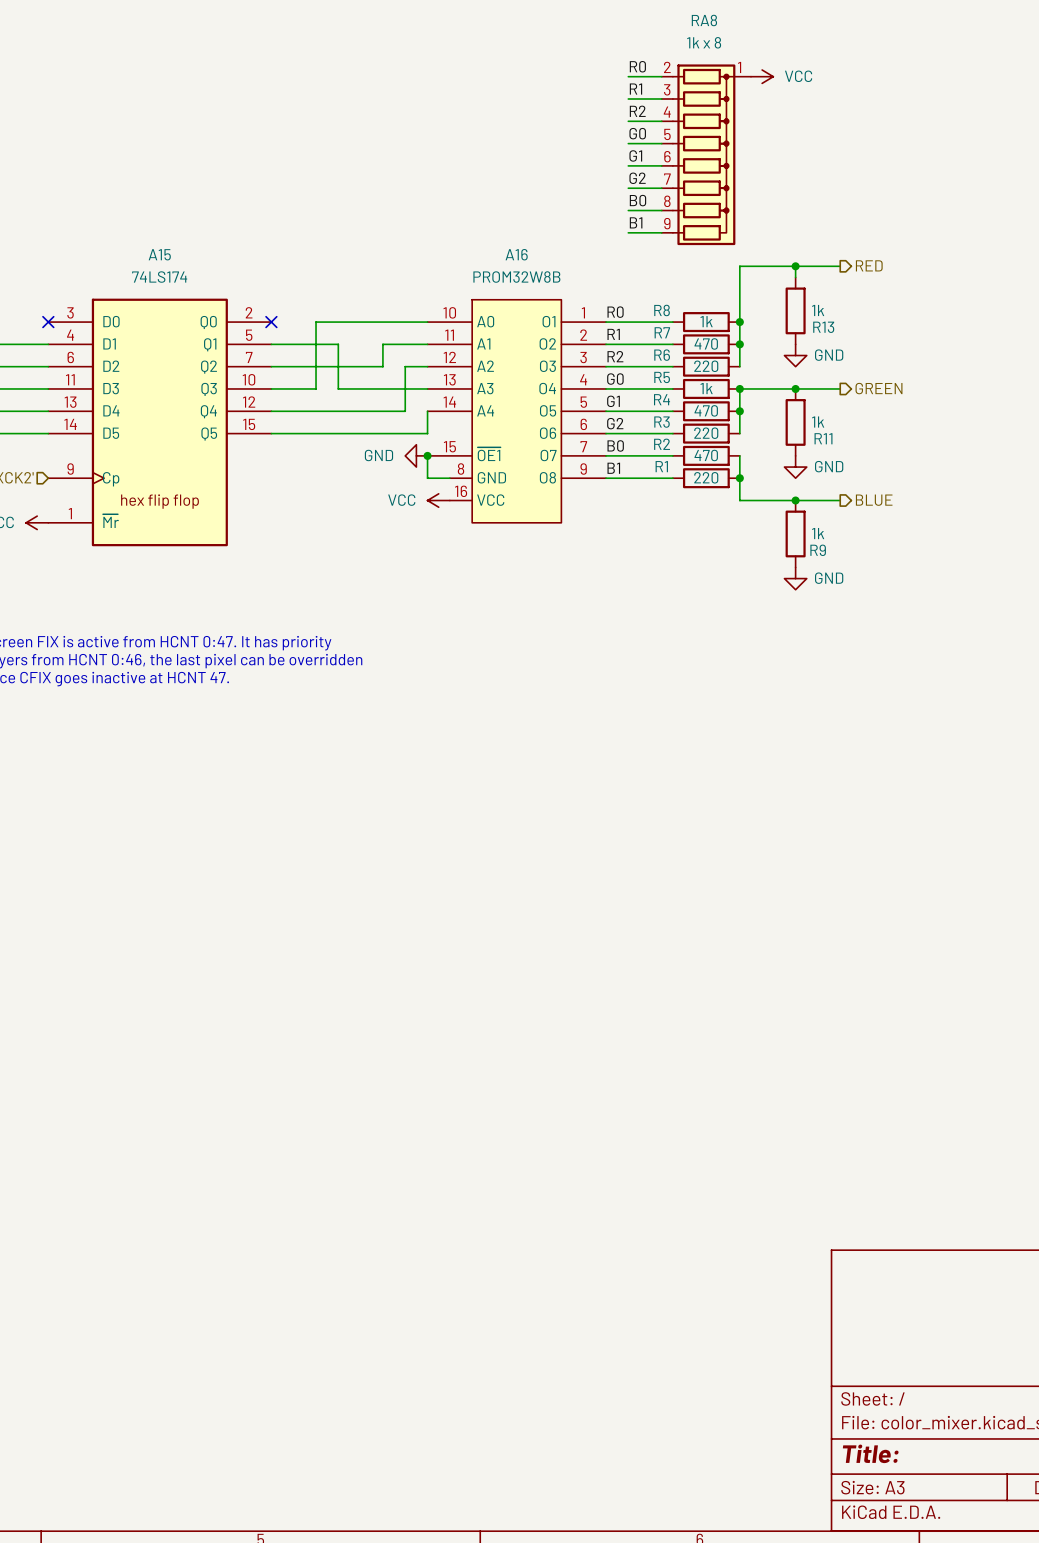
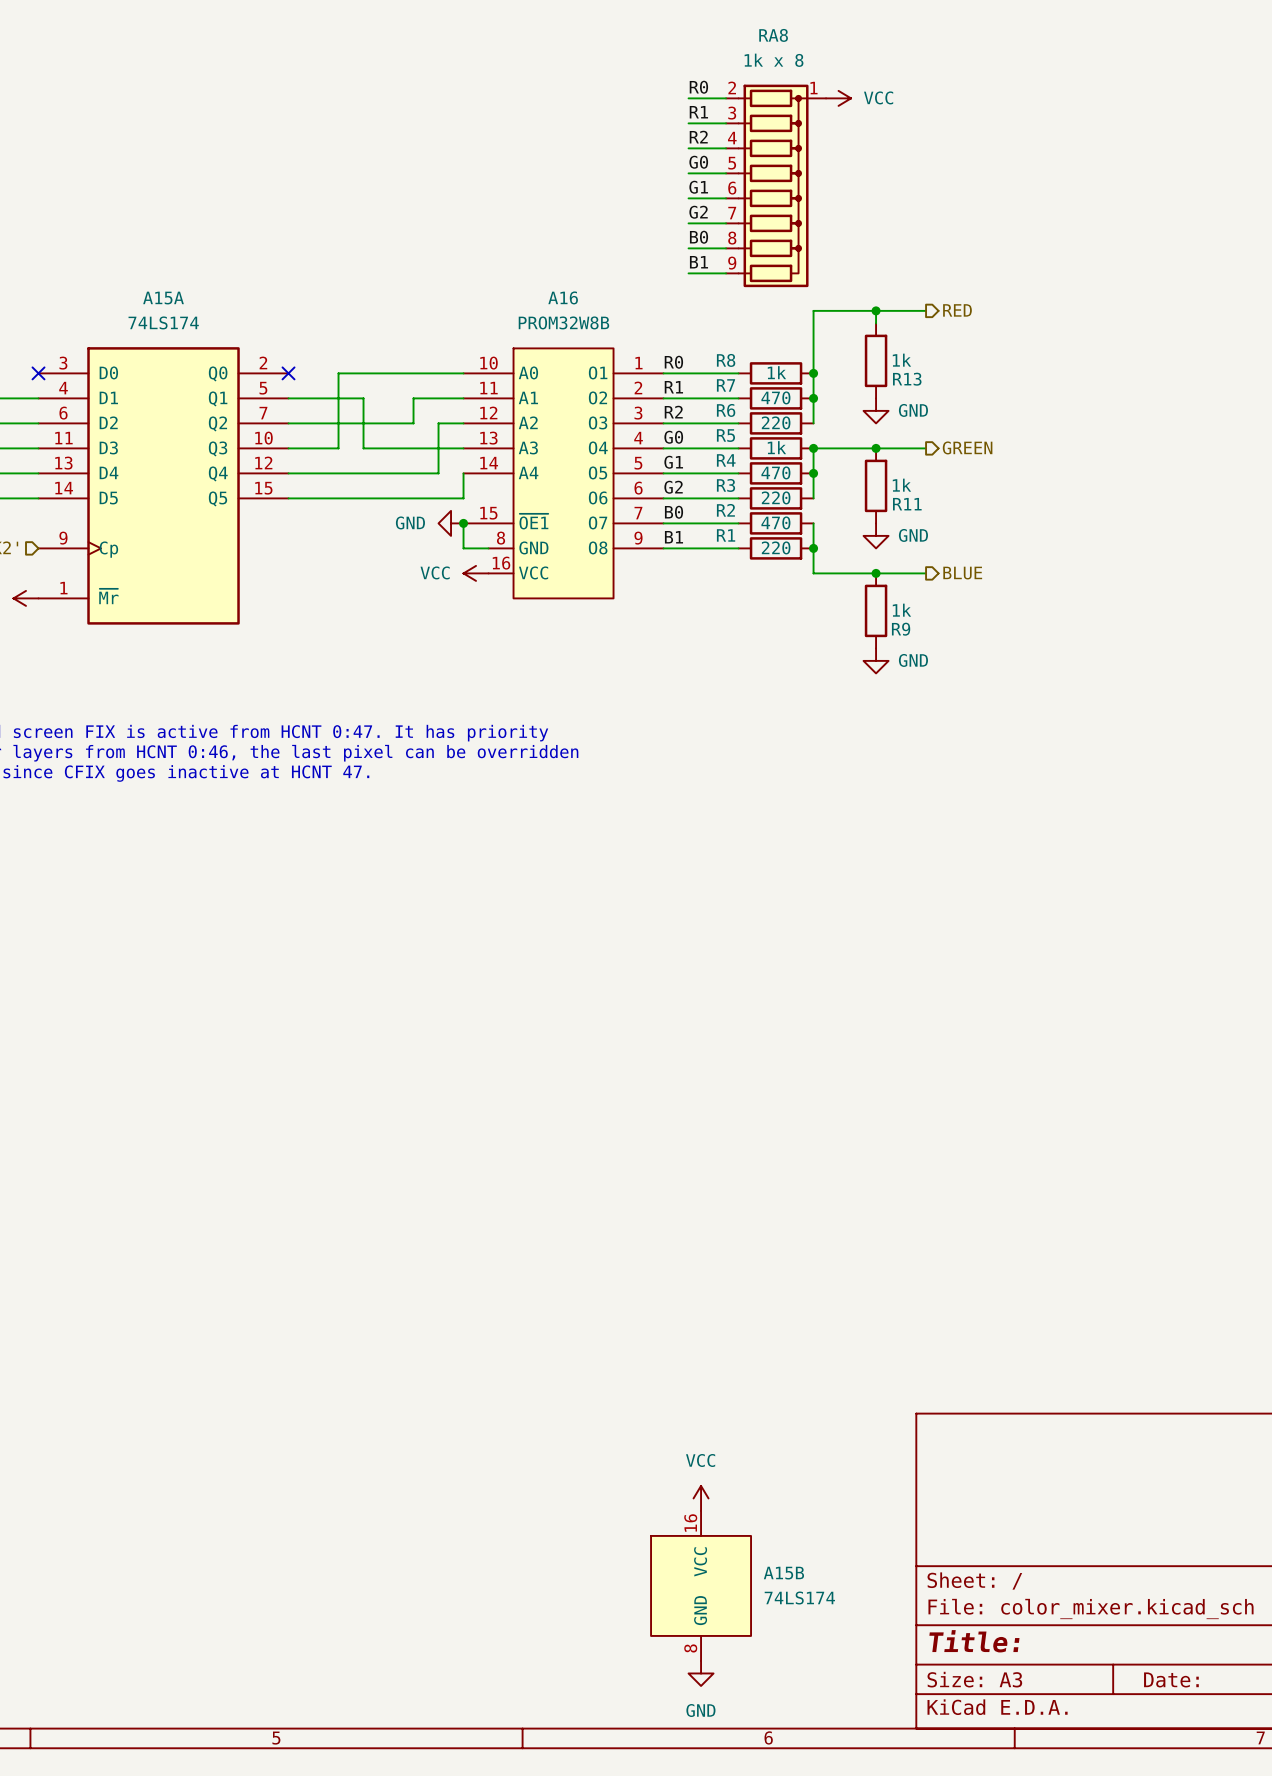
A15 name: A15 (159, 254) -> A15A (163, 298)
A15 text: hex flip flop (159, 501) -> none
power symbol: none -> VCC (701, 1498)
A15B: none -> 74LS174 (701, 1585)
power symbol: none -> GND (701, 1673)

